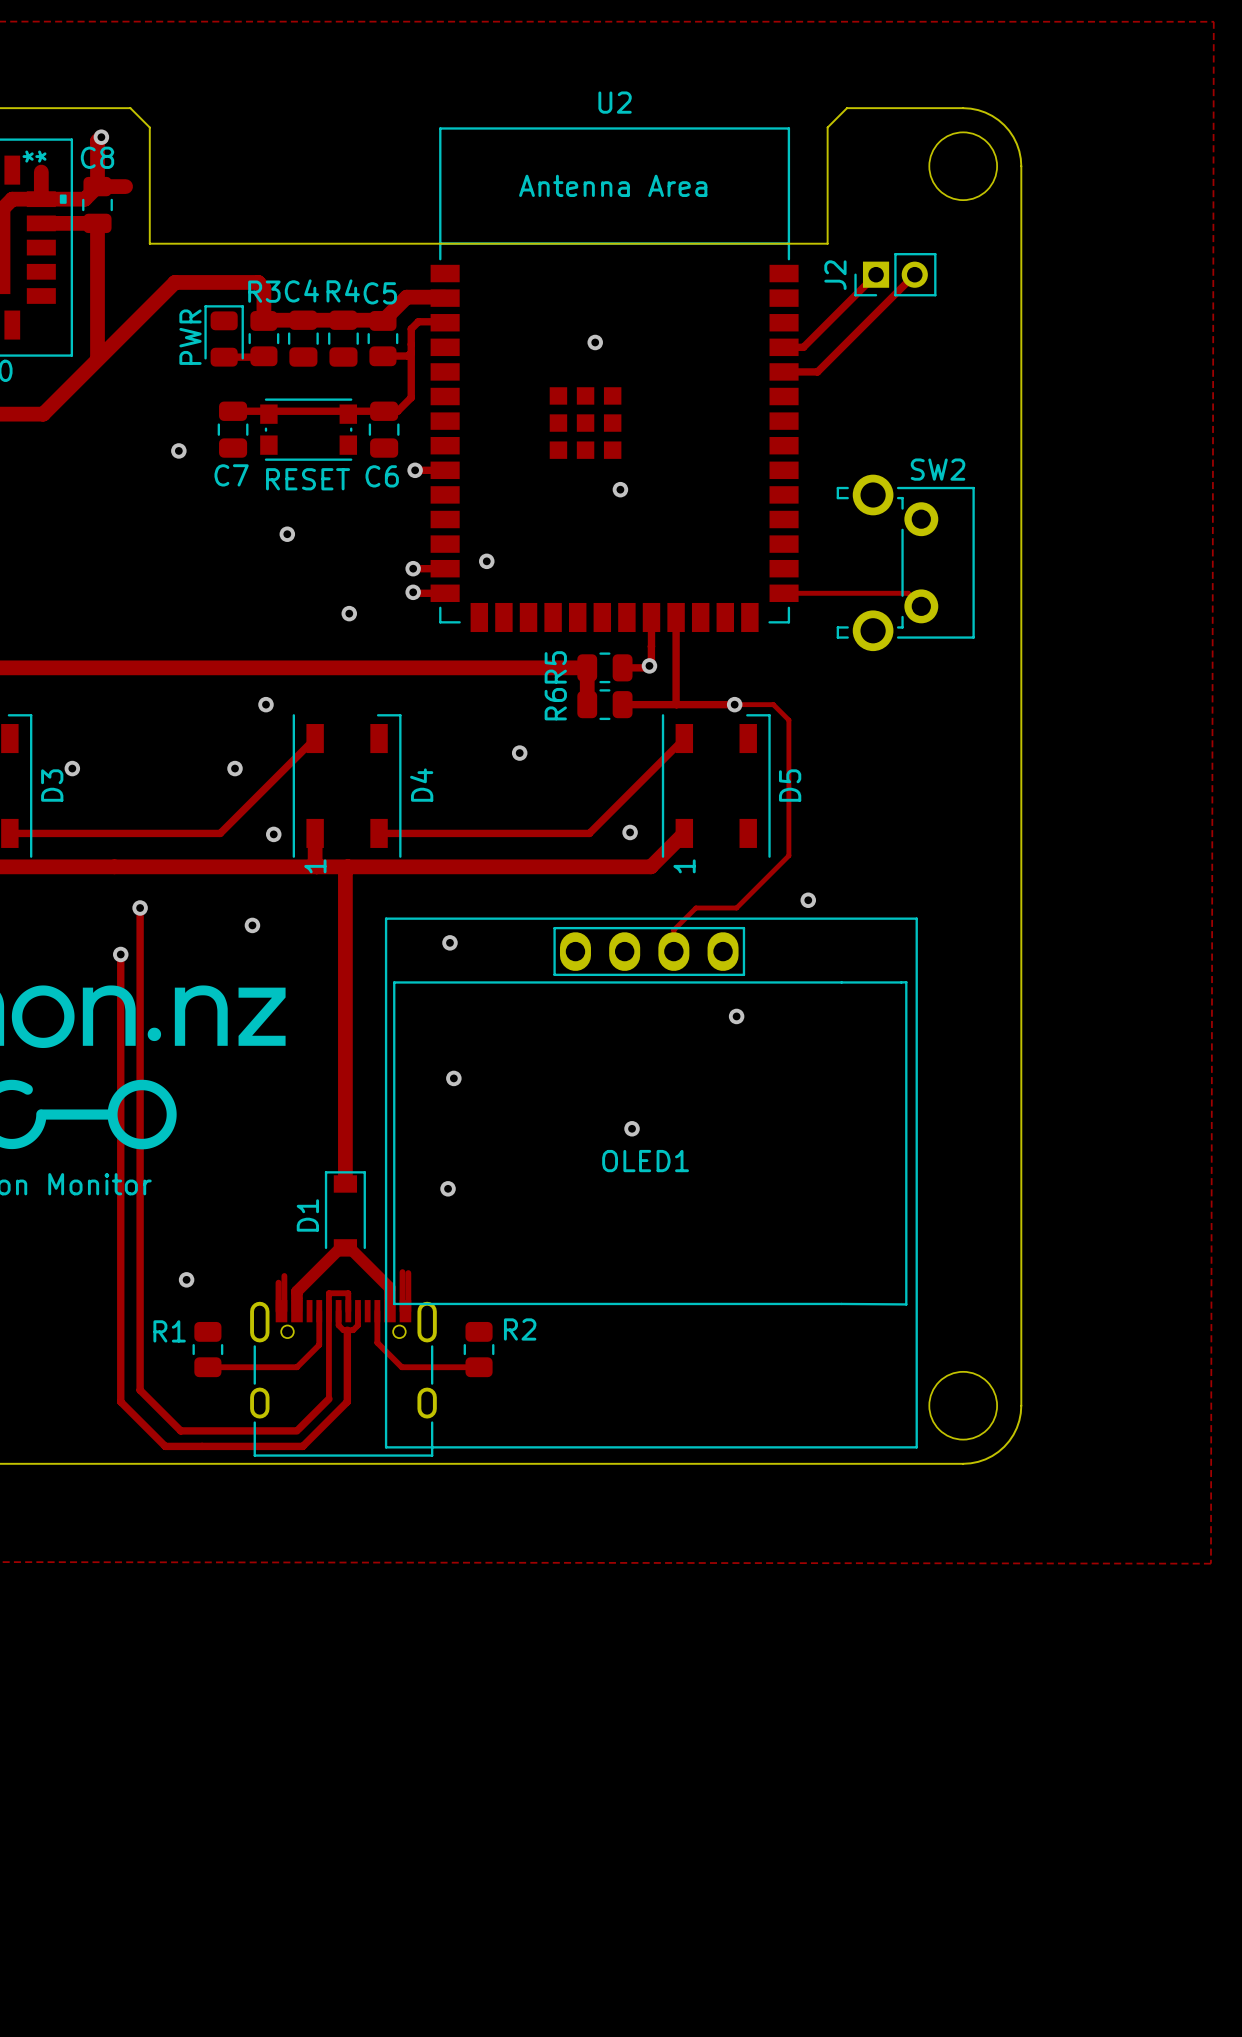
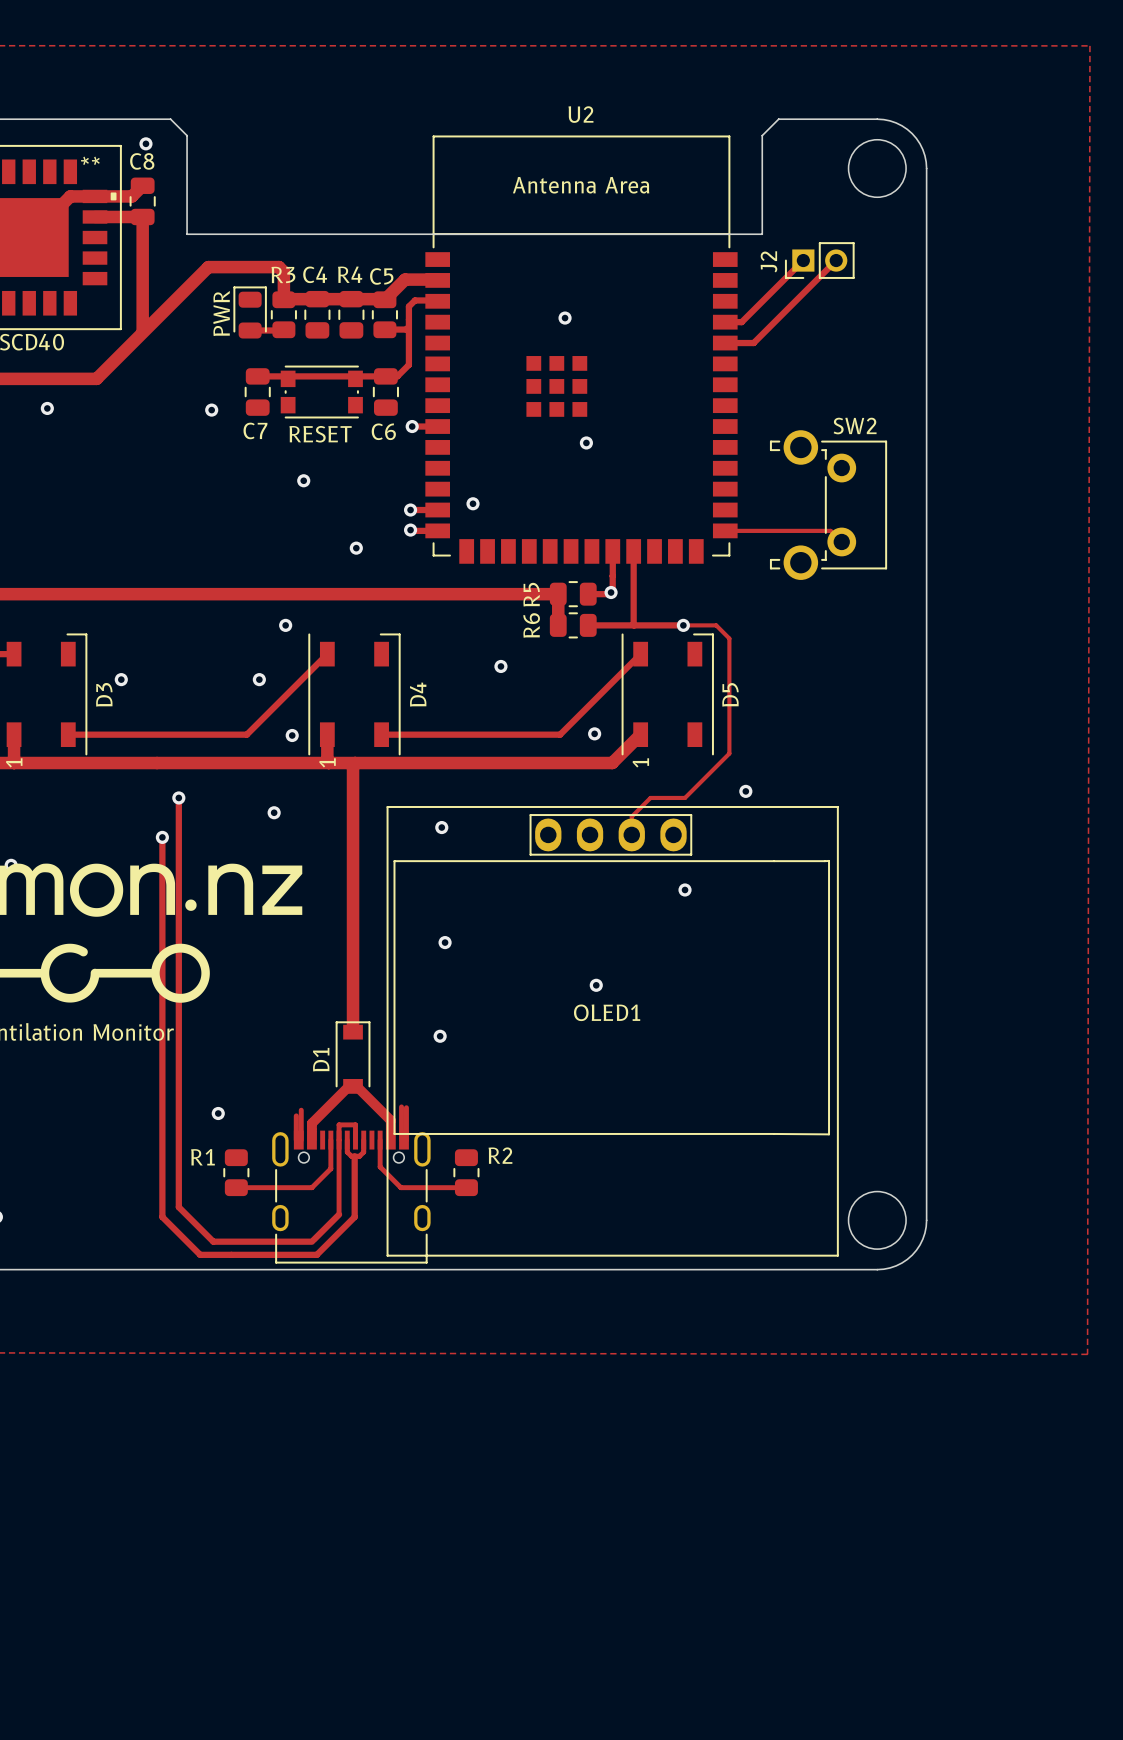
track: (101, 137) (97, 141) (97, 186) (125, 186) -> none
track: (41, 172) (41, 199) -> none

